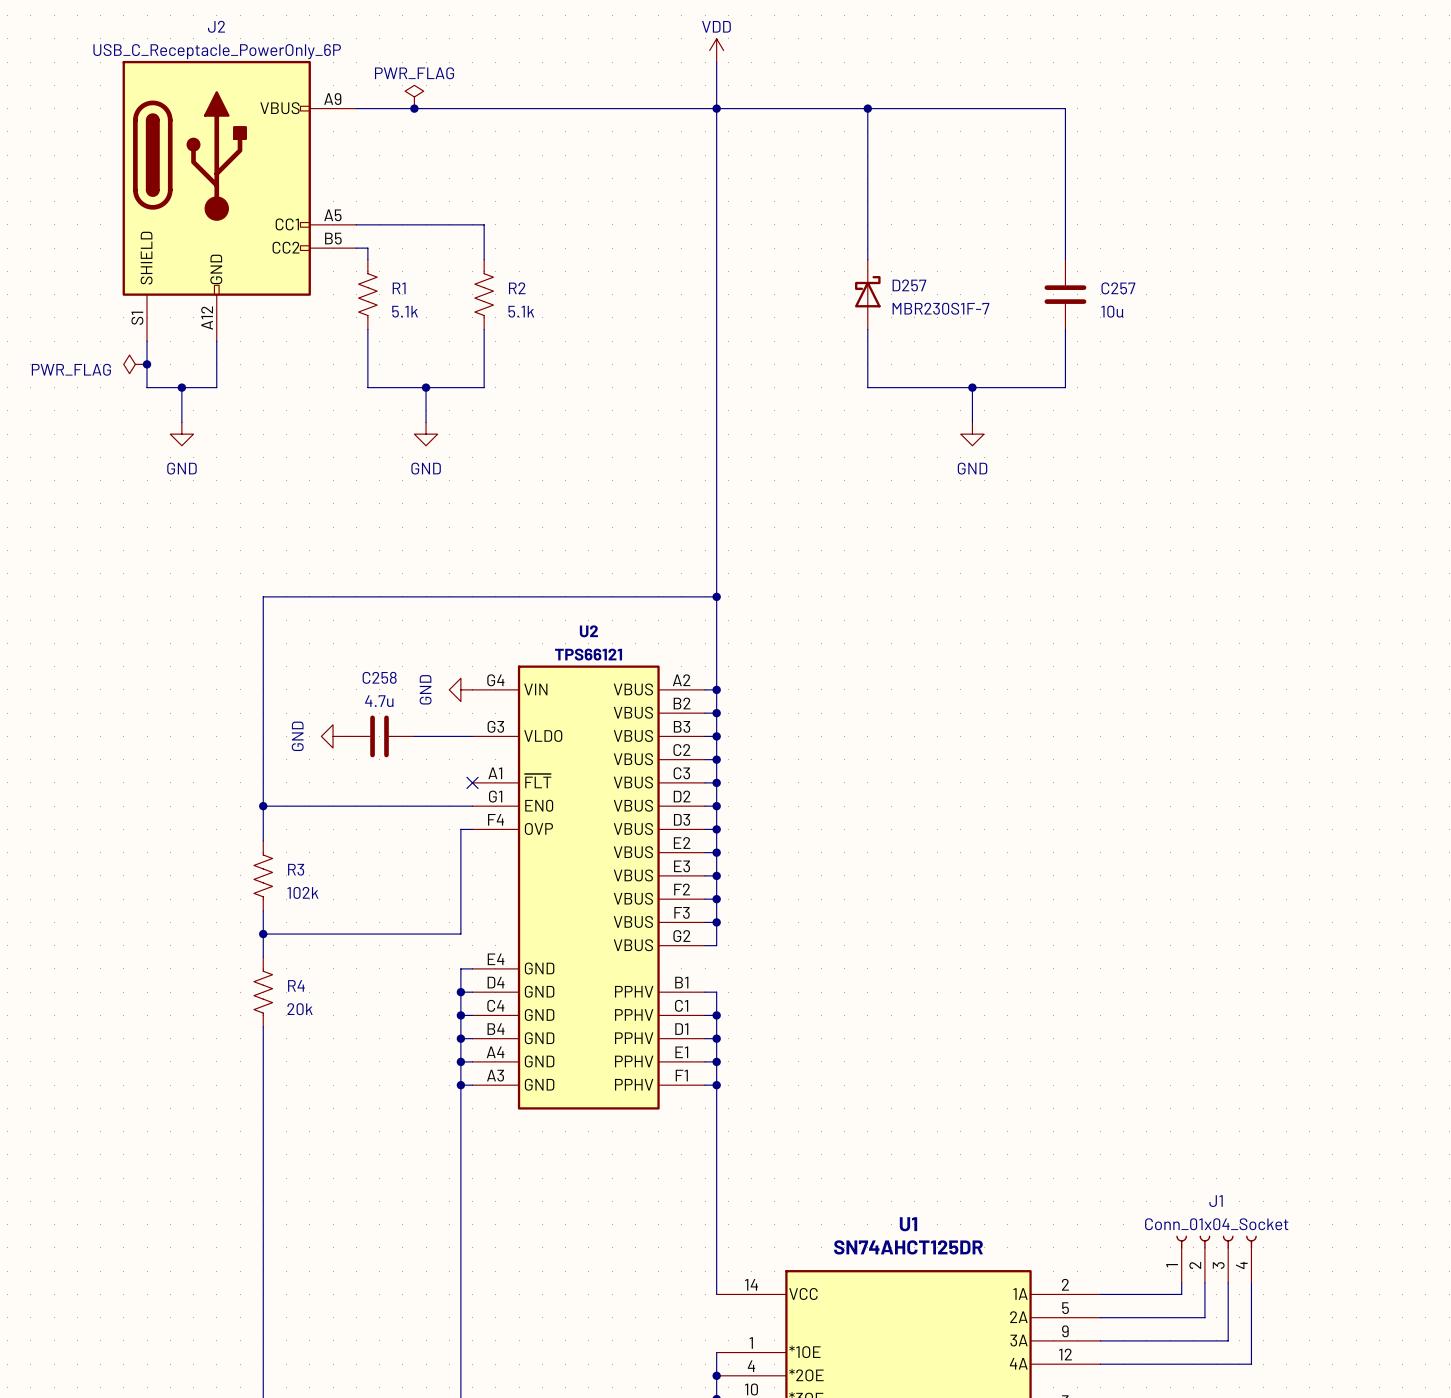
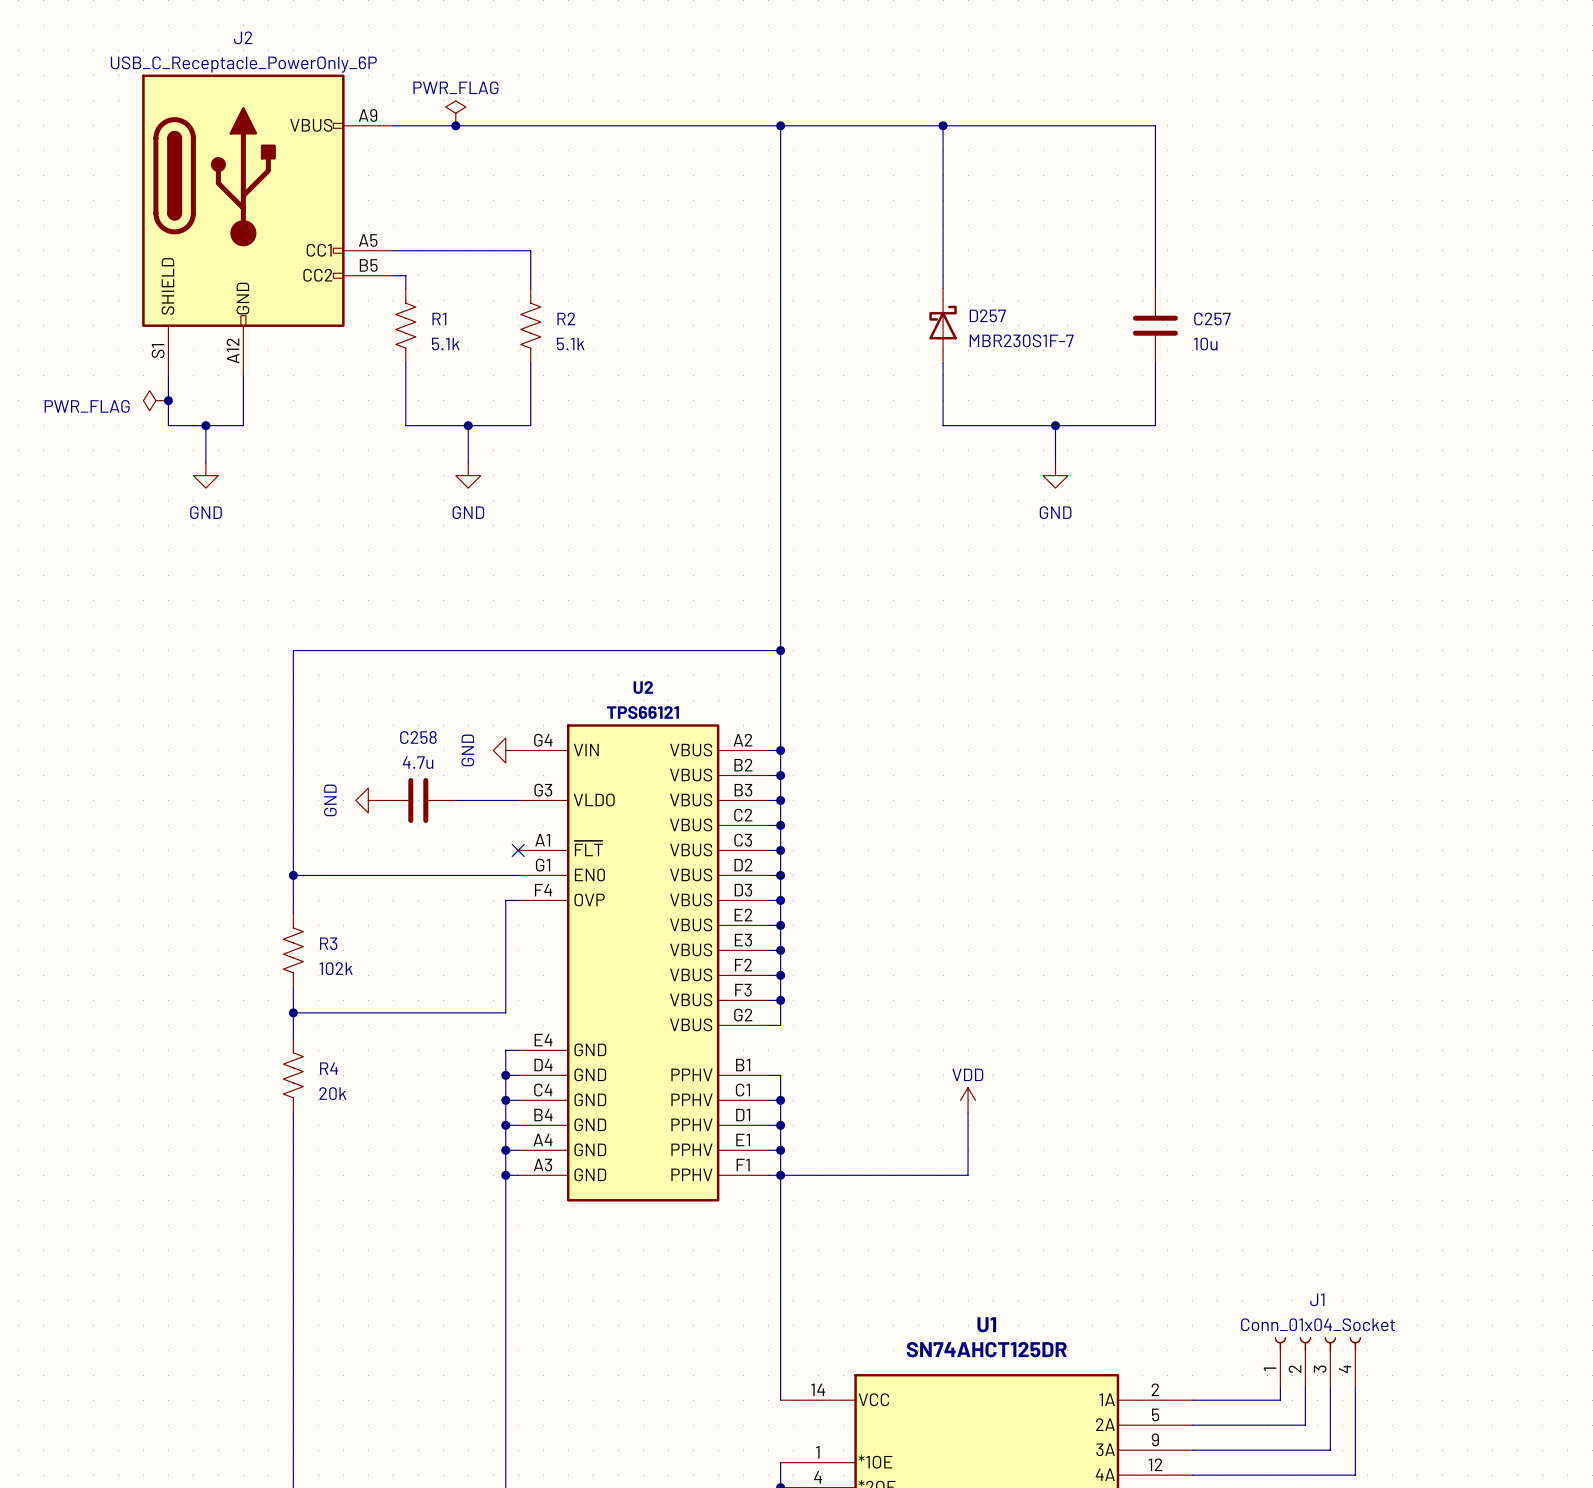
power symbol: VDD (716, 50) -> none
wire: (716, 62) (716, 108) -> none
power symbol: none -> VDD (968, 1100)
wire: none -> (968, 1112) (968, 1175) (780, 1175)

